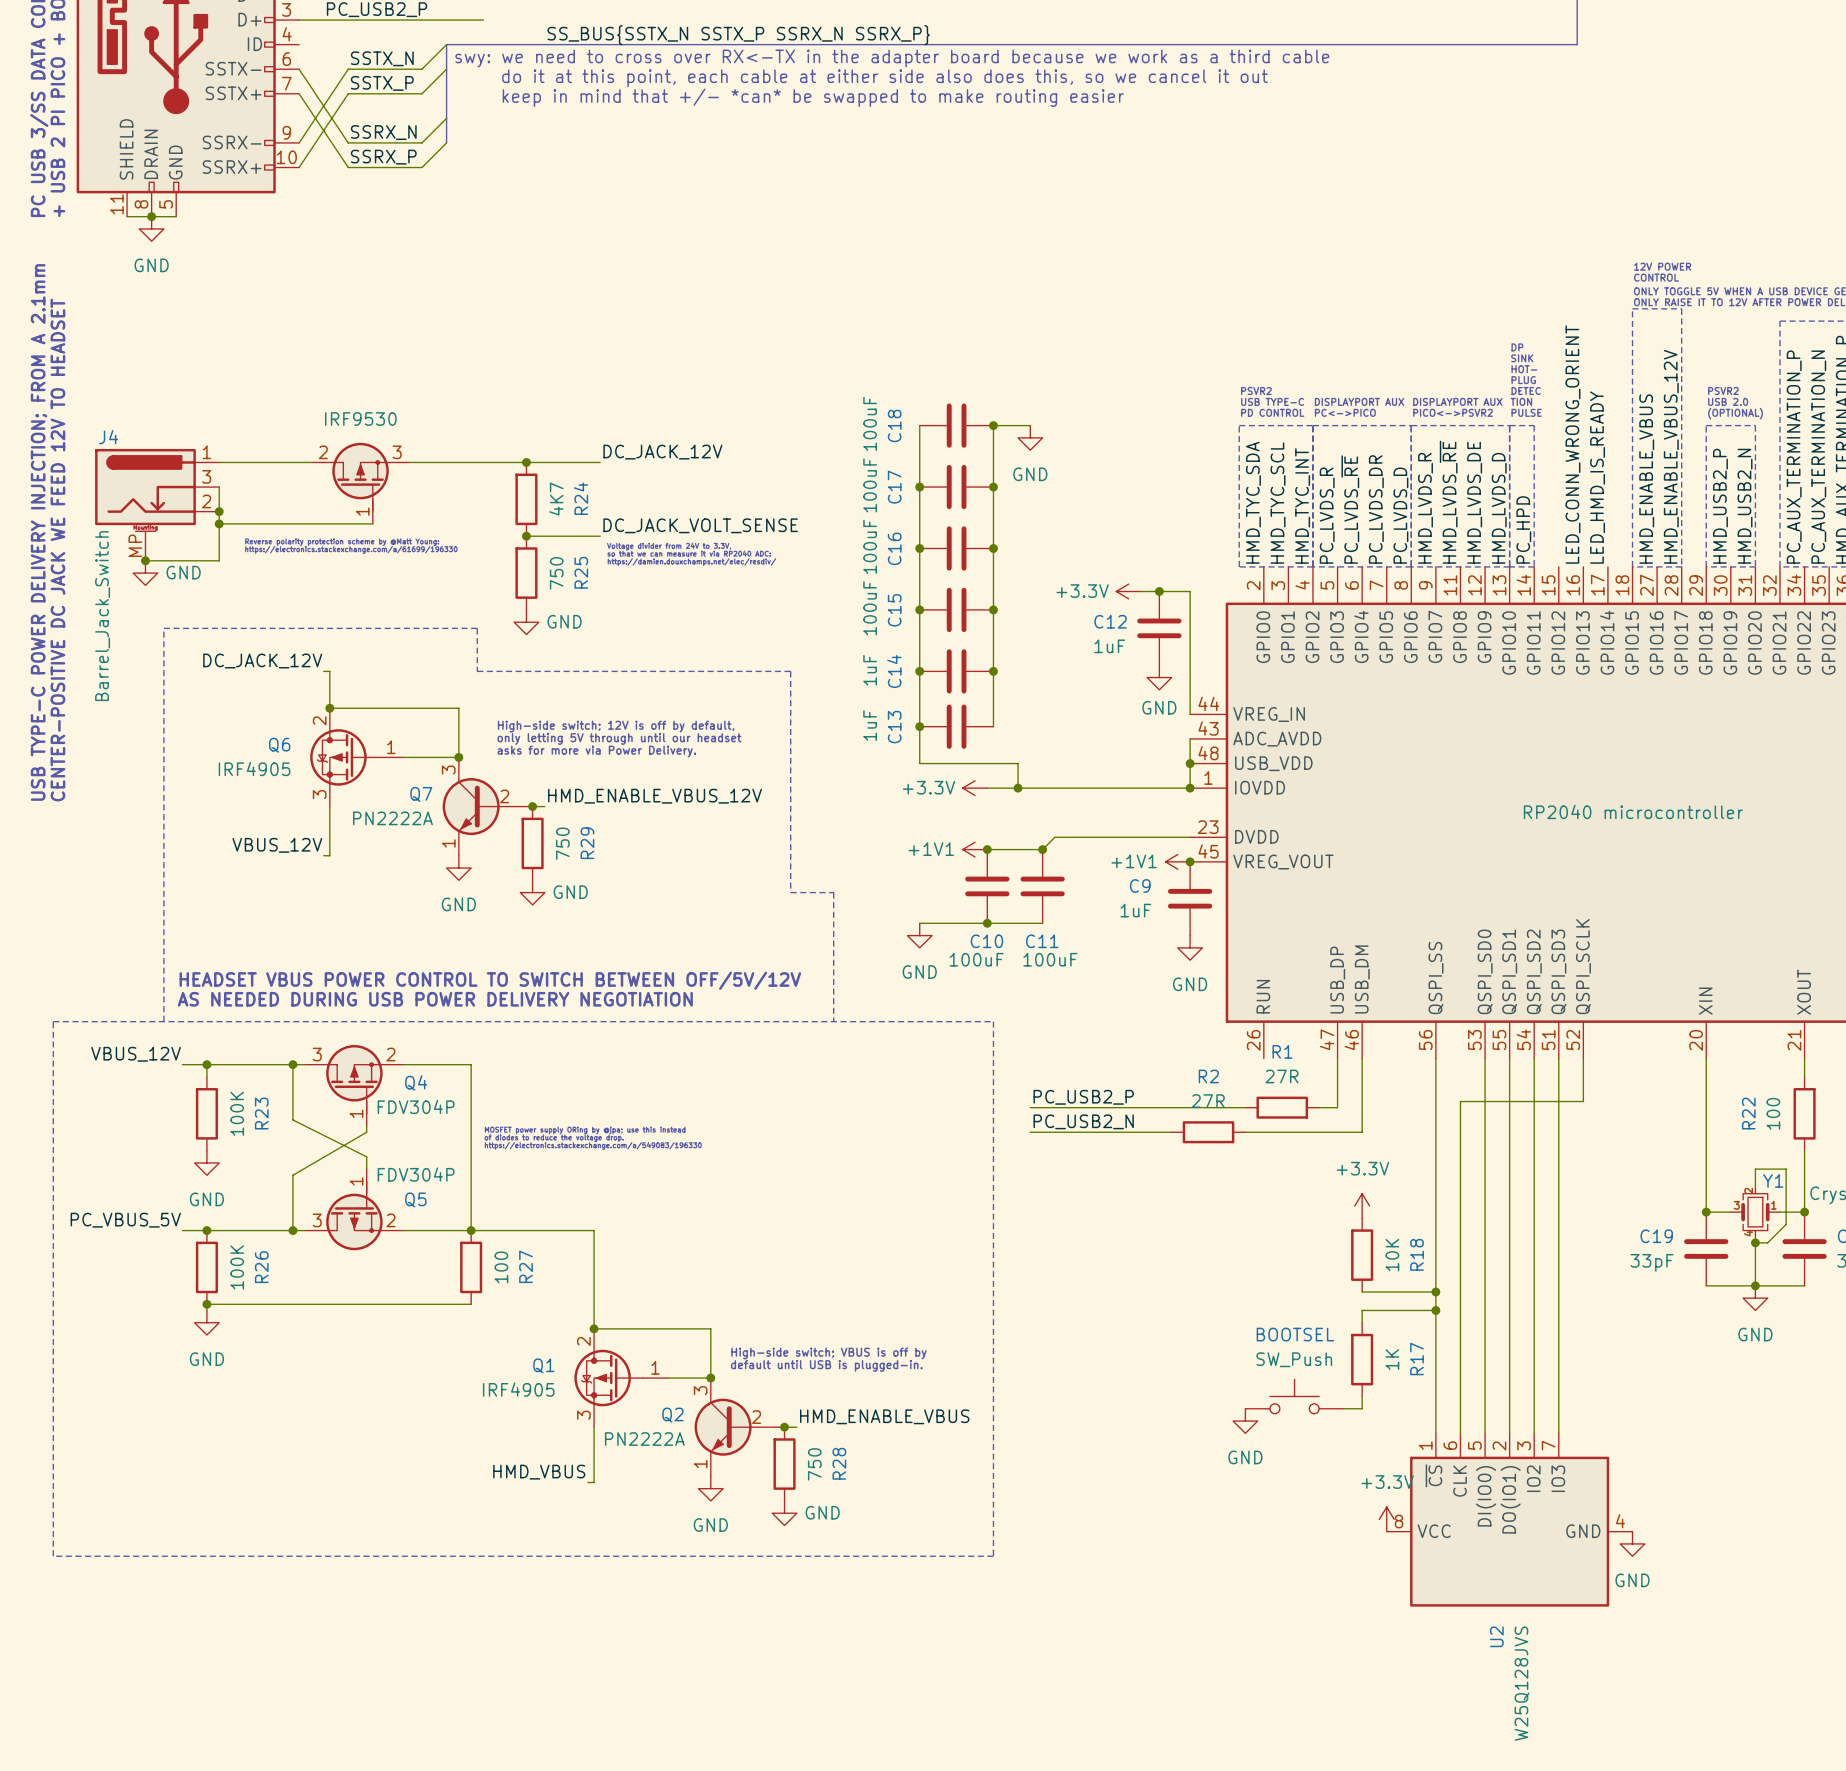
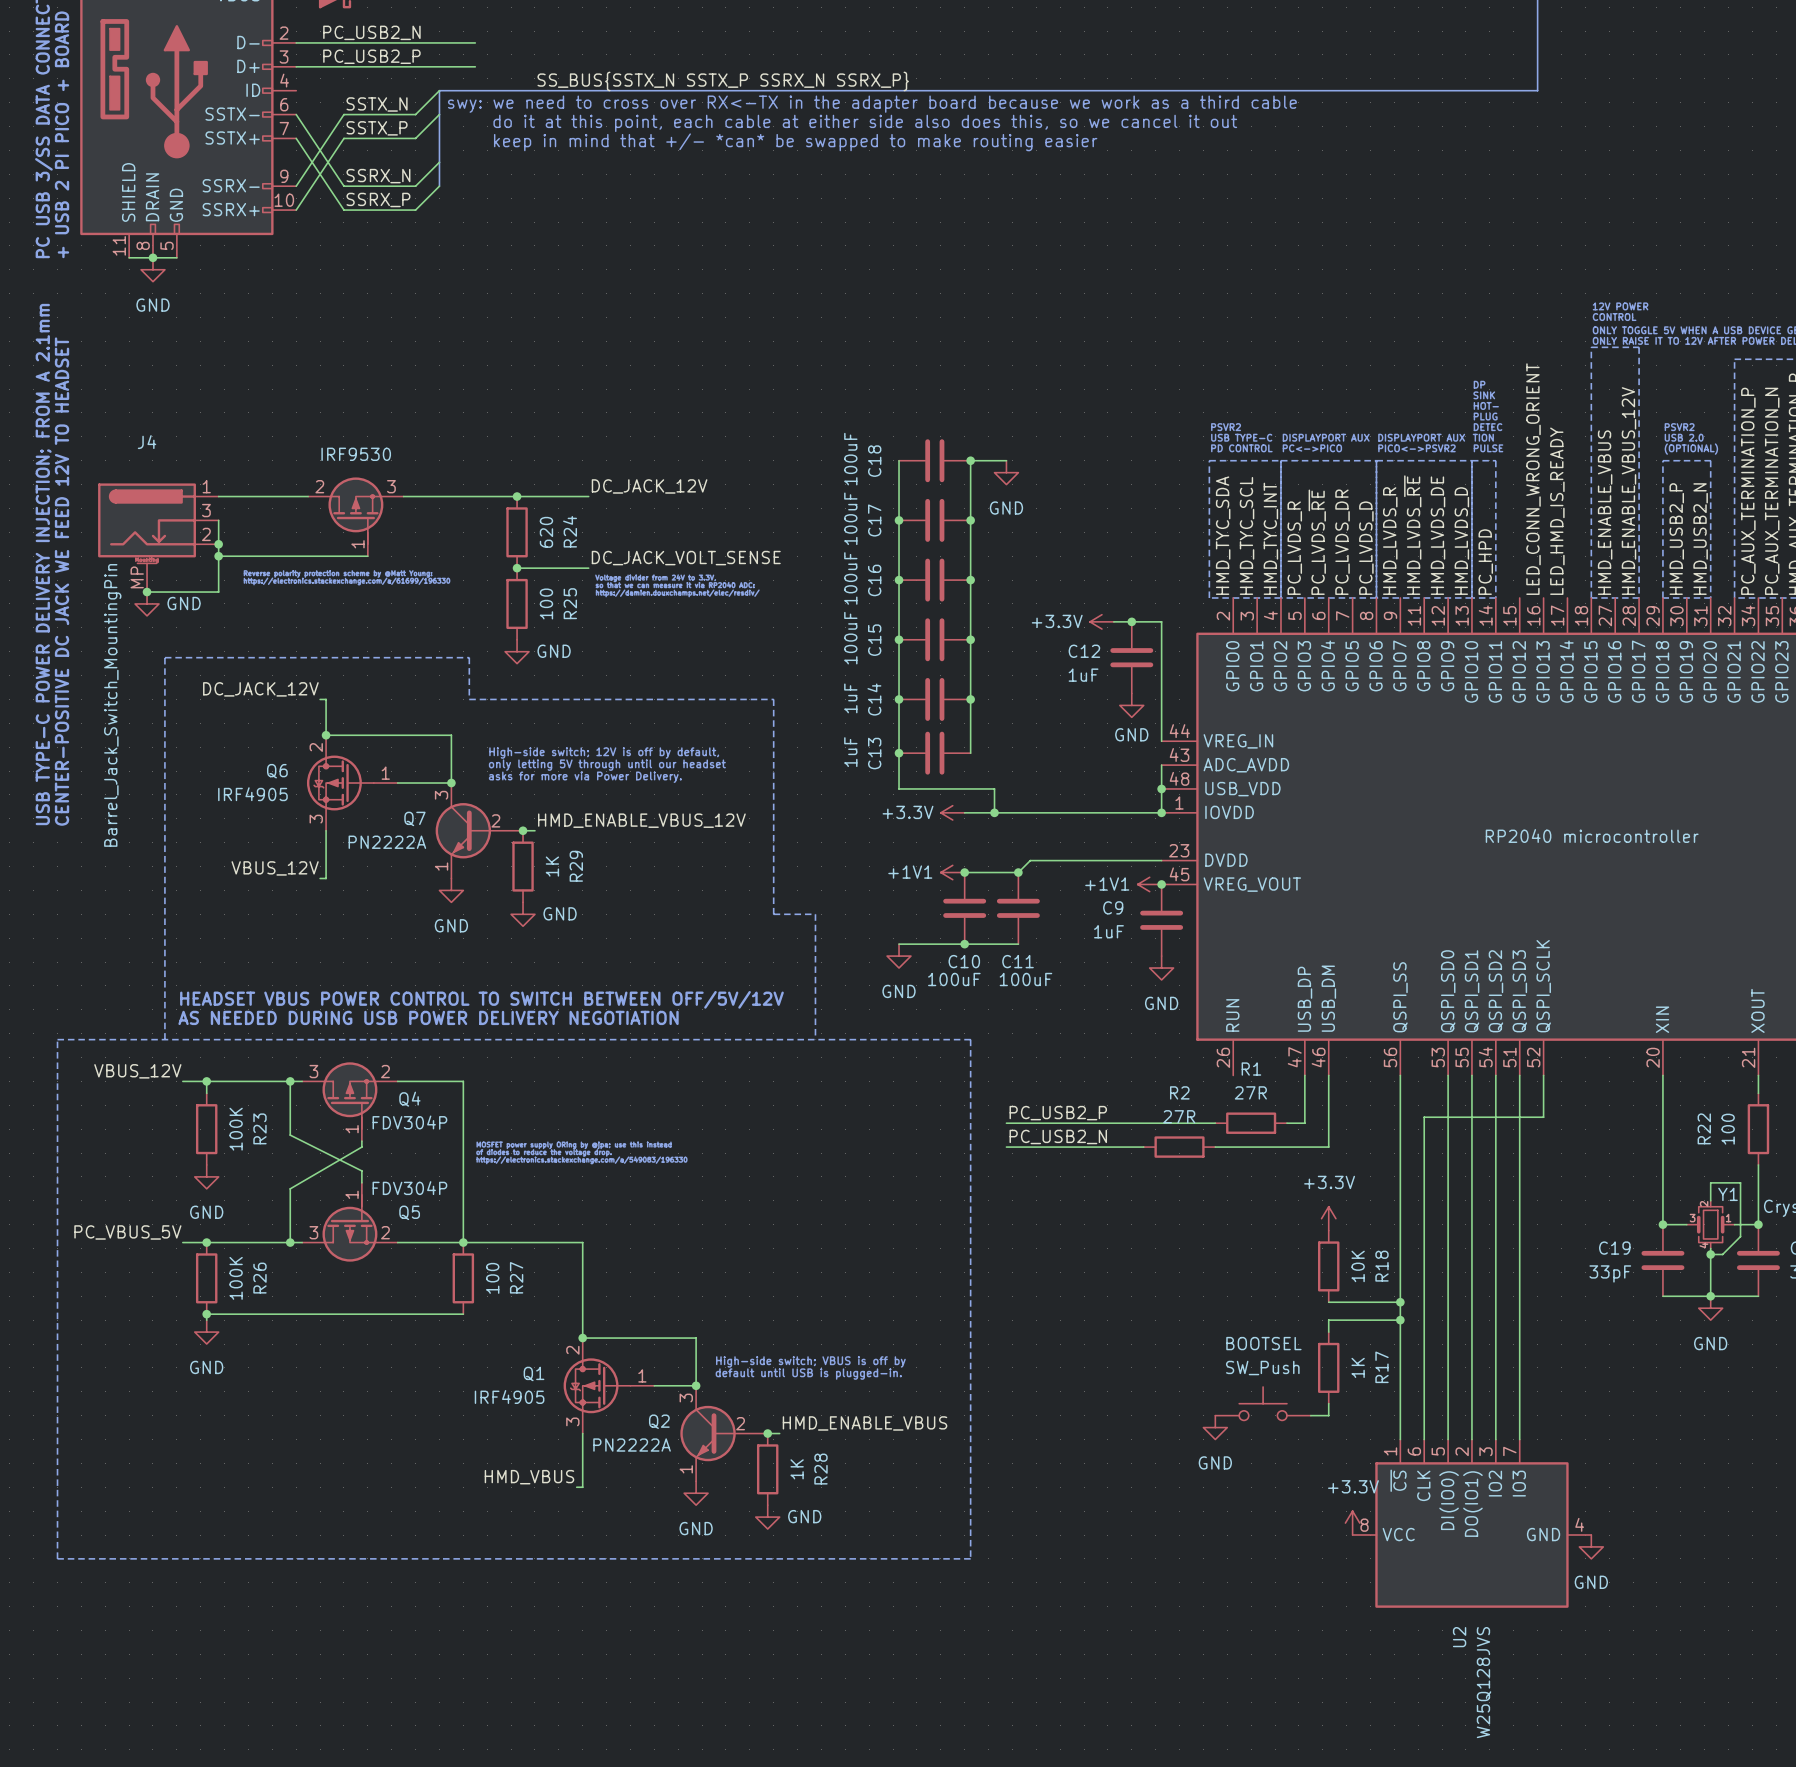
J4 name position: J4 (108, 437) -> J4 (147, 442)
R24 value: 4K7 (556, 499) -> 620 (546, 532)
R25 value: 750 (556, 573) -> 100 (546, 603)
J4 value: Barrel_Jack_Switch (102, 616) -> Barrel_Jack_Switch_MountingPin (112, 705)
R29 value: 750 (562, 843) -> 1K (552, 866)
R28 value: 750 (814, 1464) -> 1K (797, 1469)

